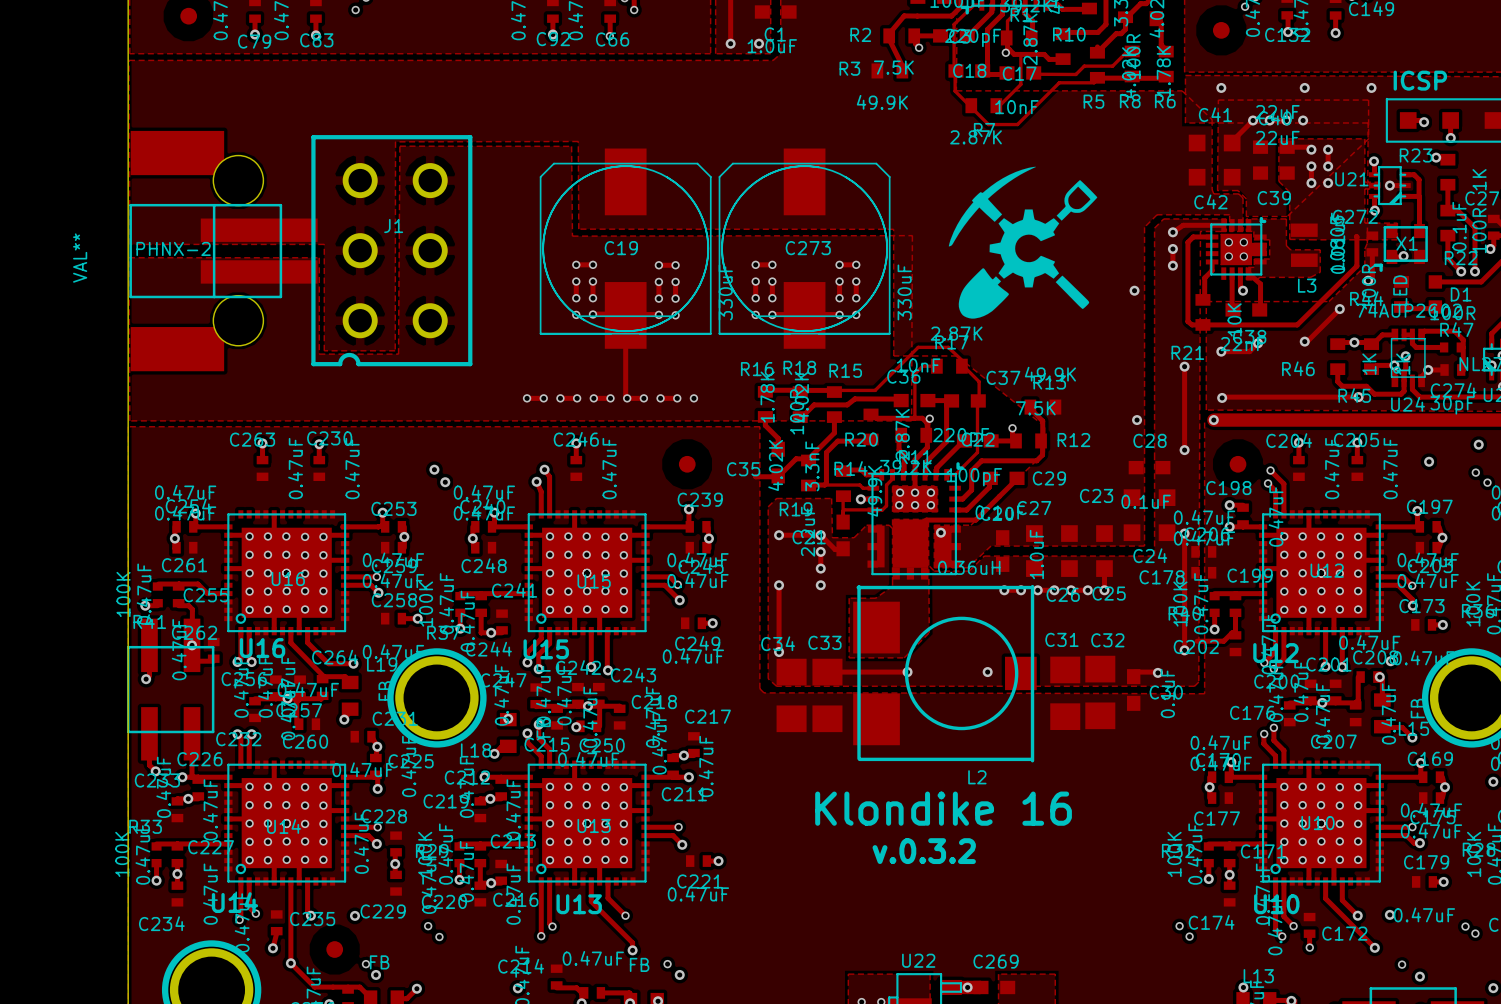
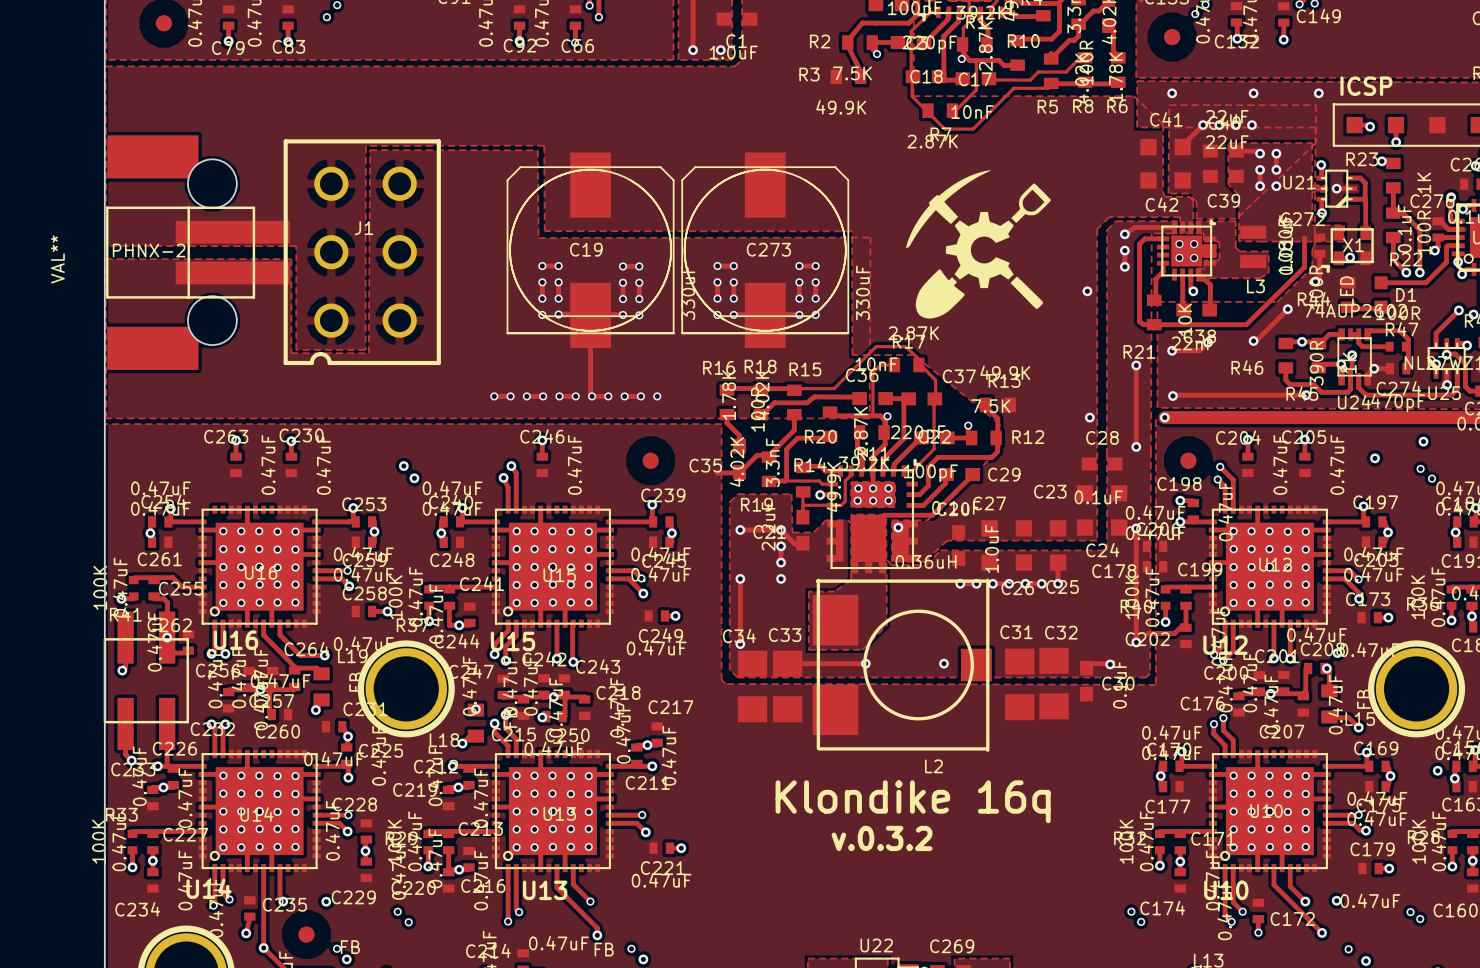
R46 value: 1K (1369, 364) -> 390R (1316, 363)
C274 value: 30pF (1452, 405) -> 470pF (1398, 402)
text: Klondike 16 (943, 808) -> Klondike 16q (913, 801)

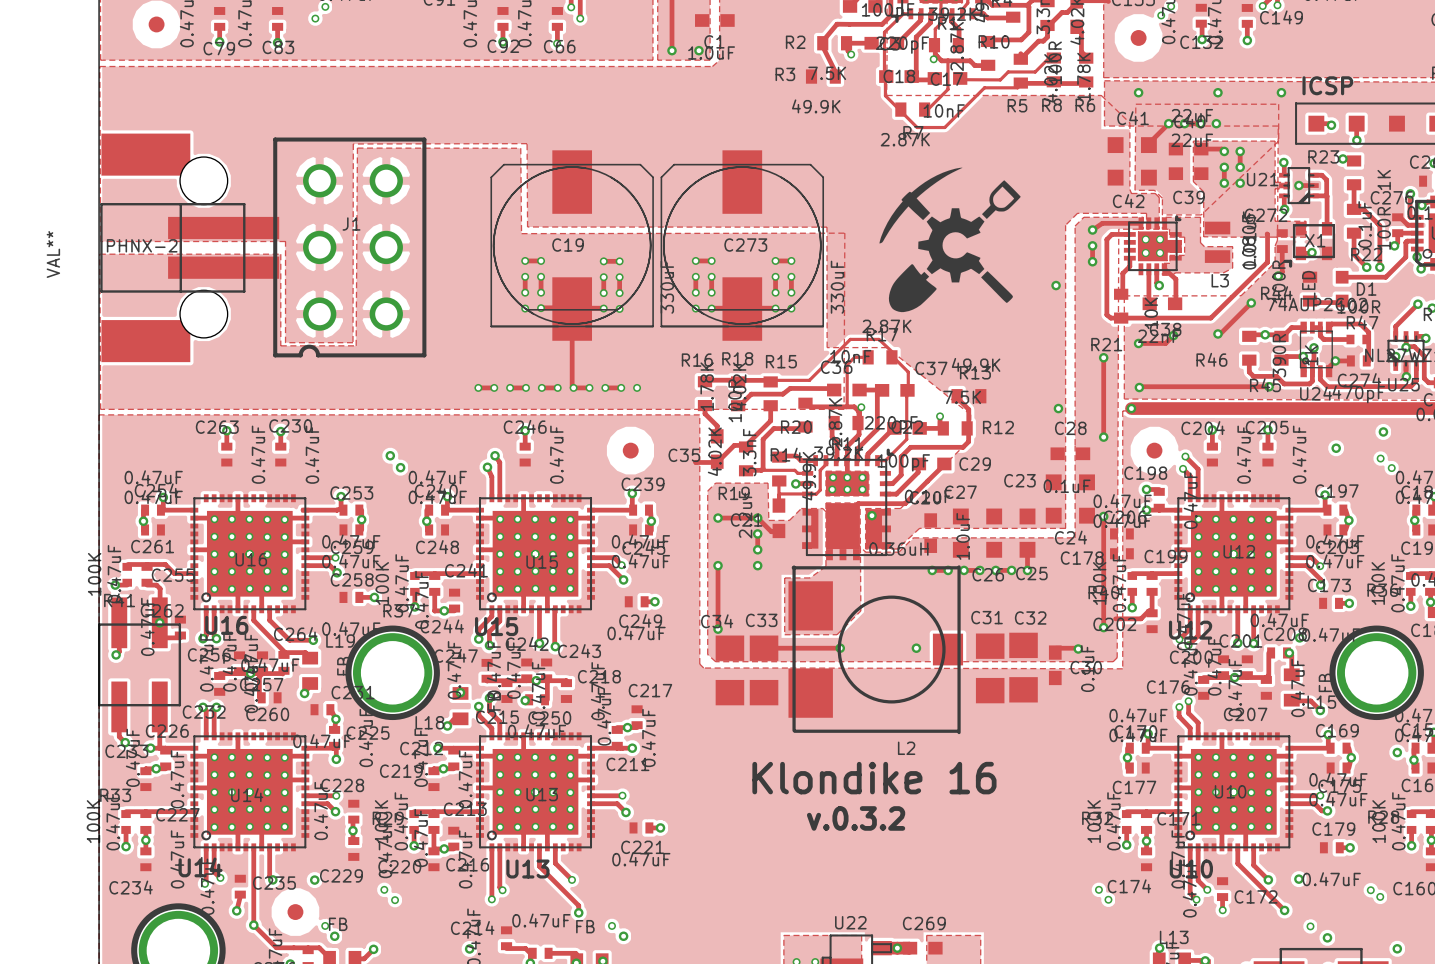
text: Klondike 16q (913, 801) -> Klondike 16 (874, 778)

